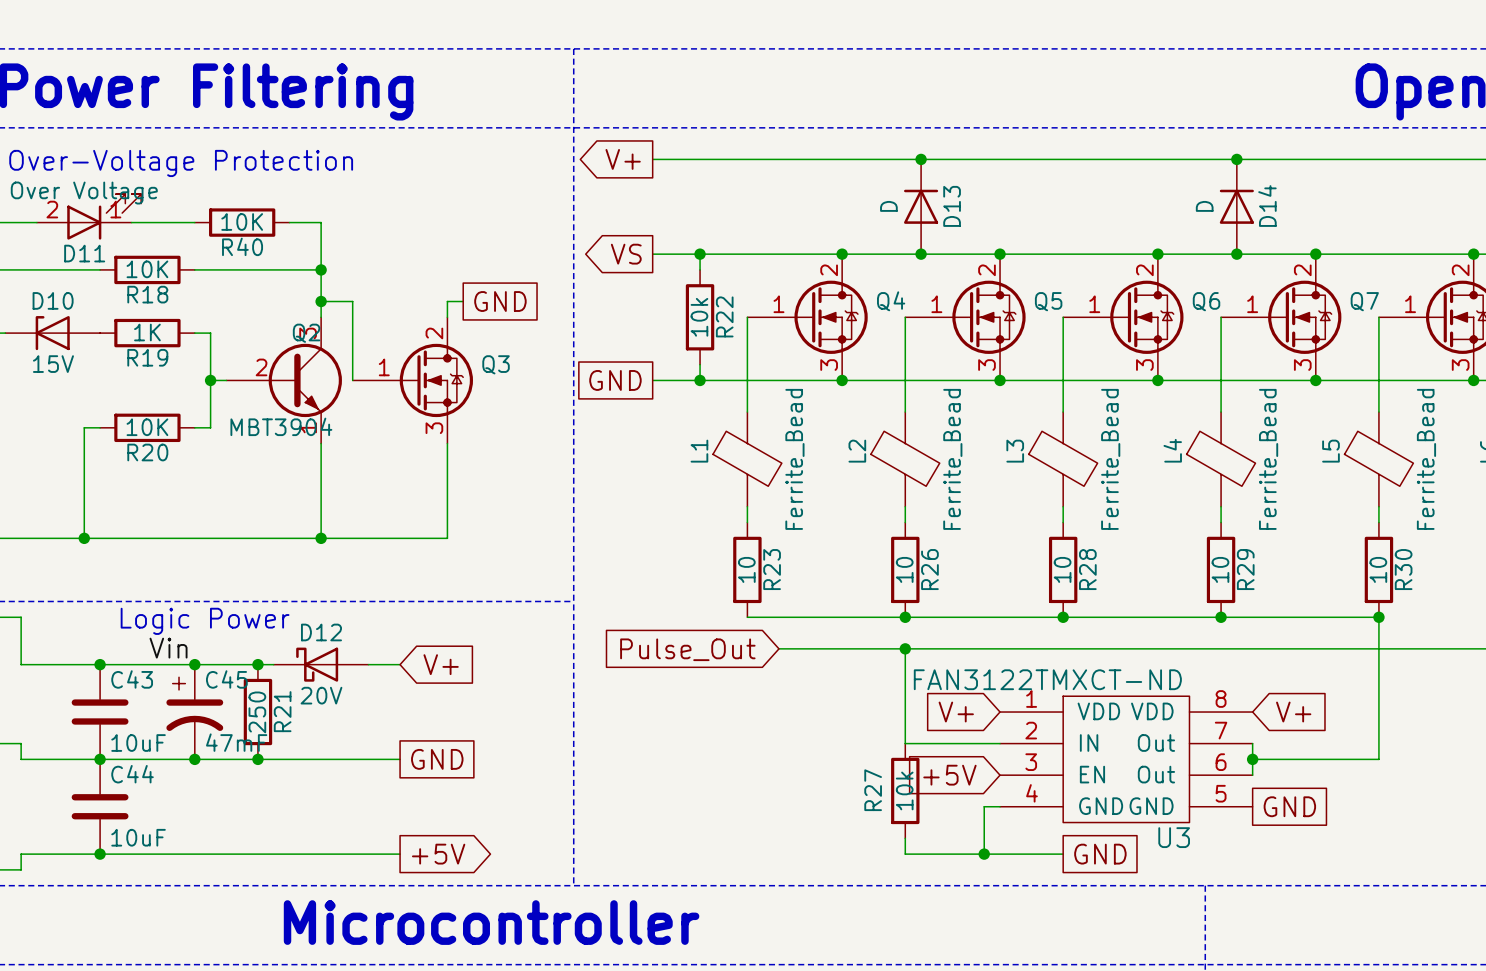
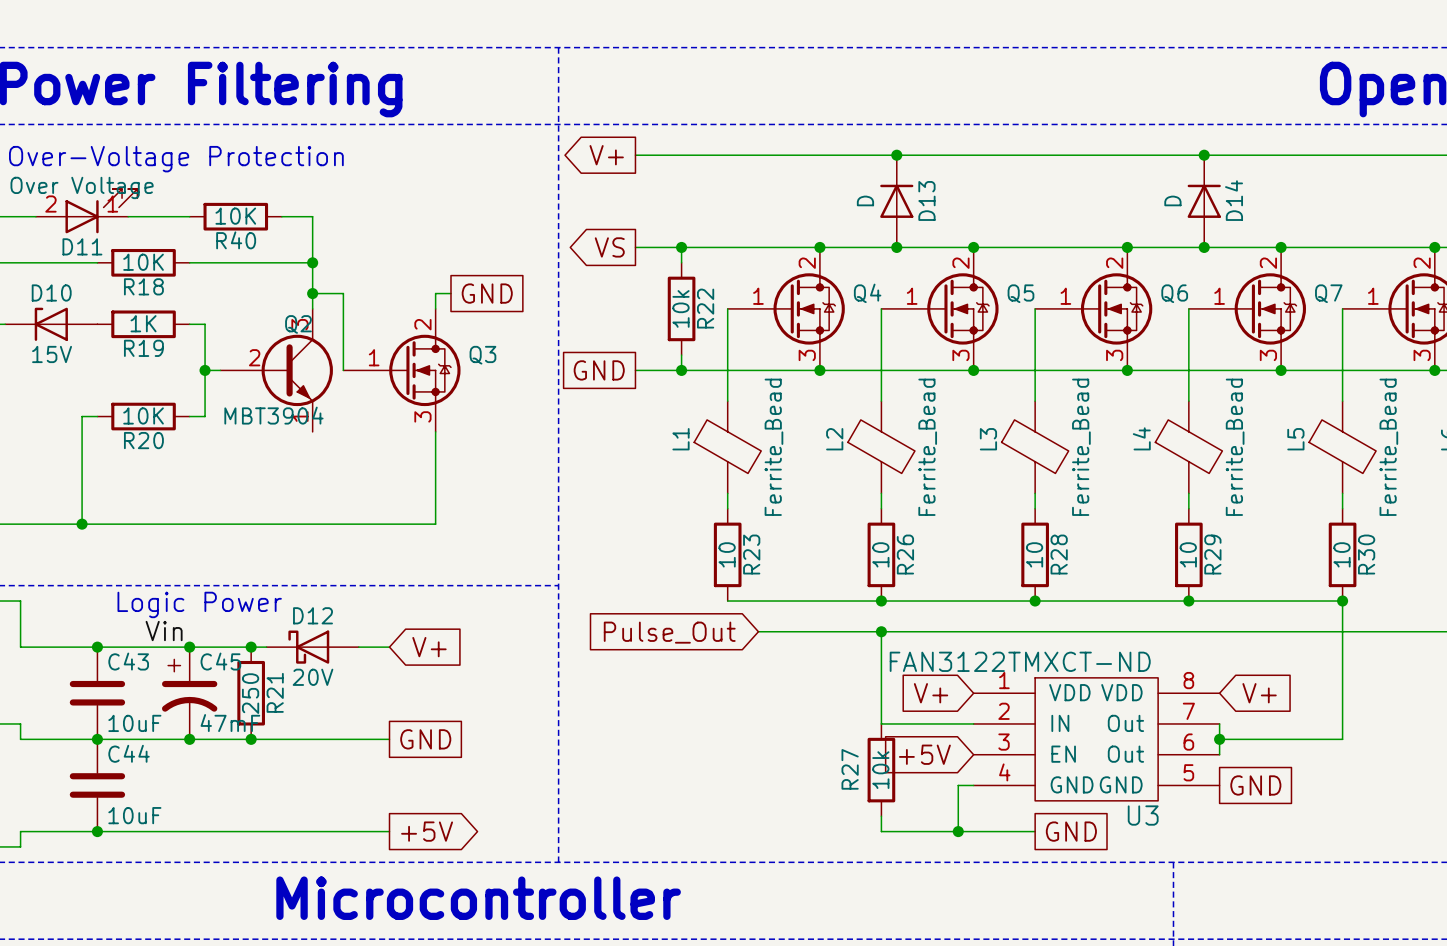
wire: (321, 443) (321, 538) -> none
junction: (321, 538) -> none

